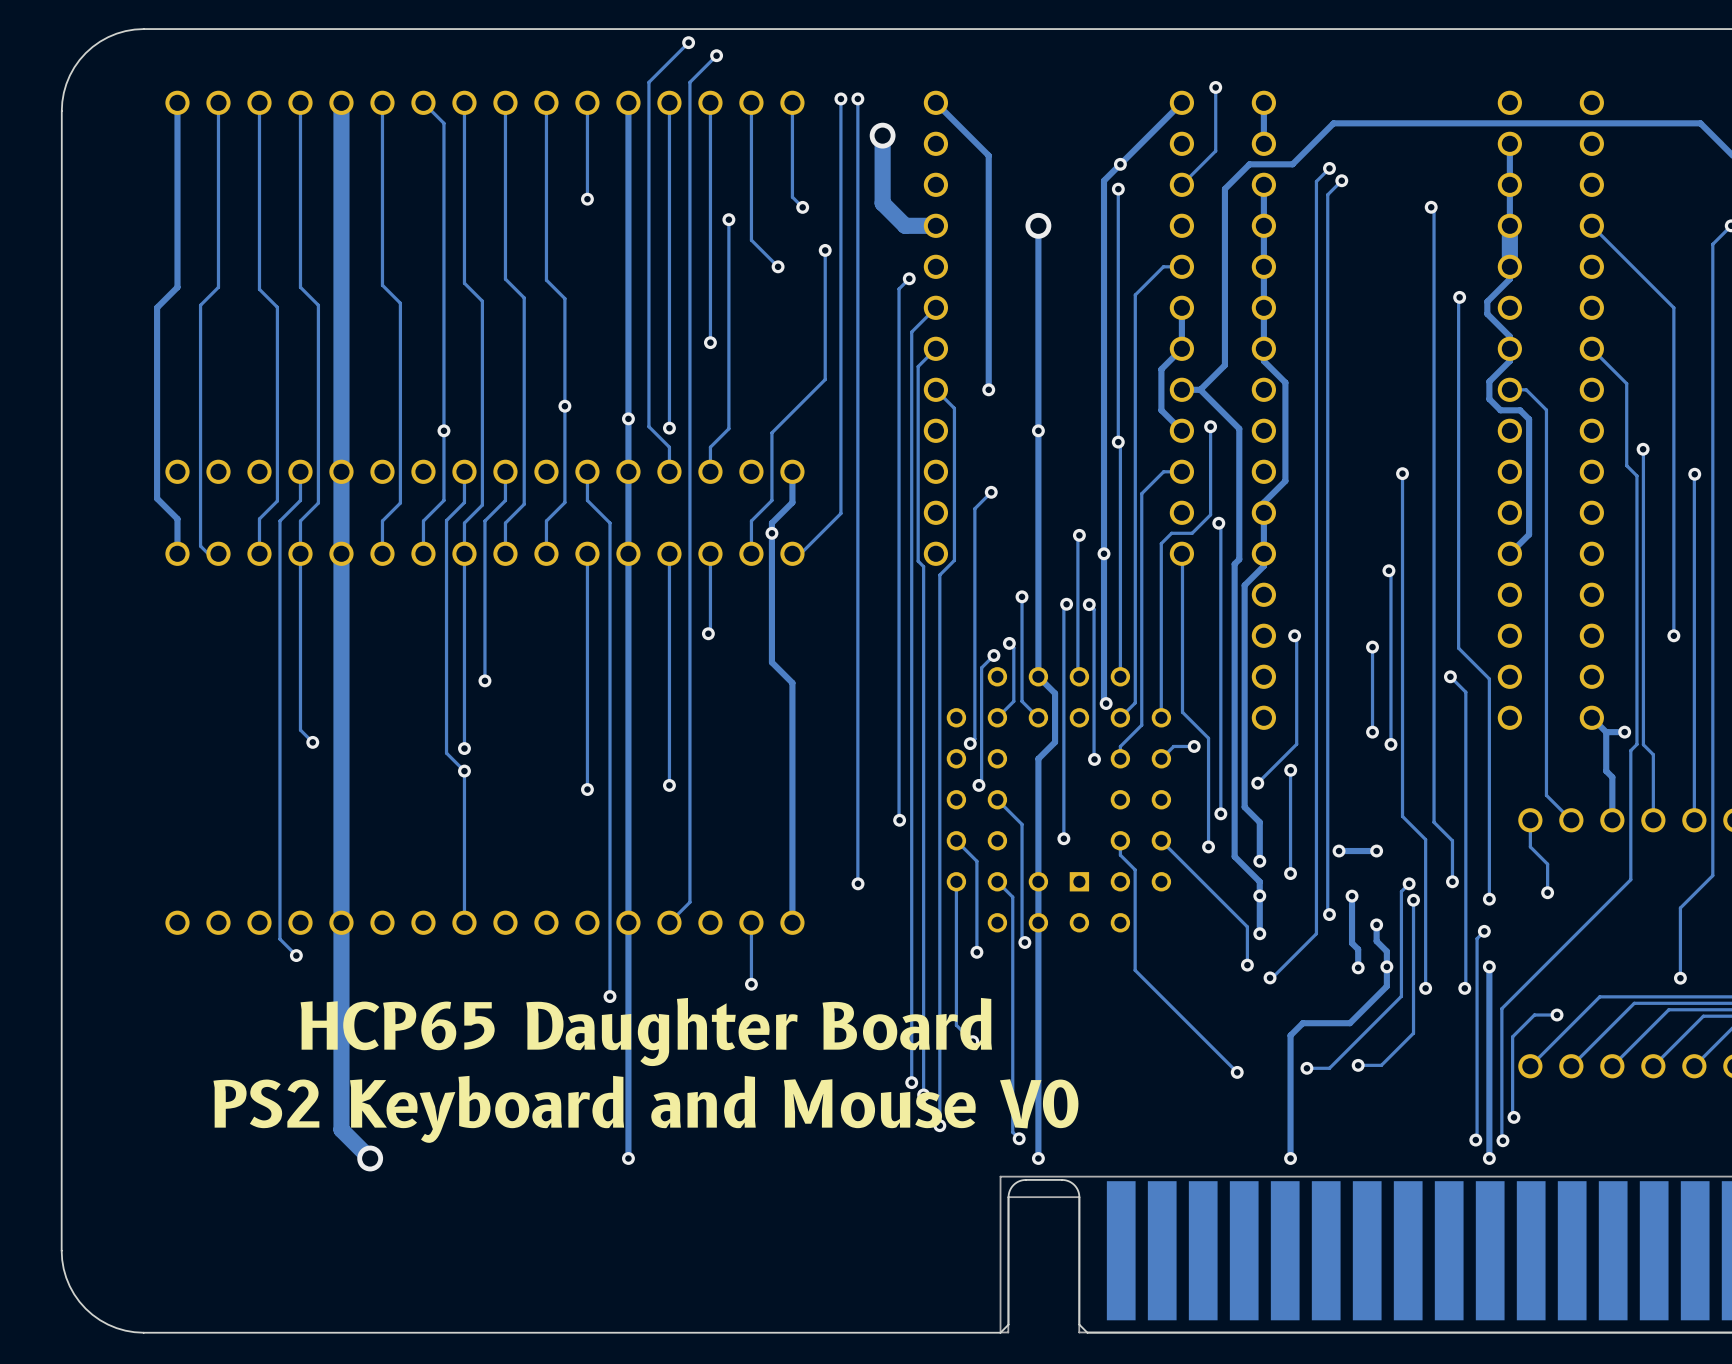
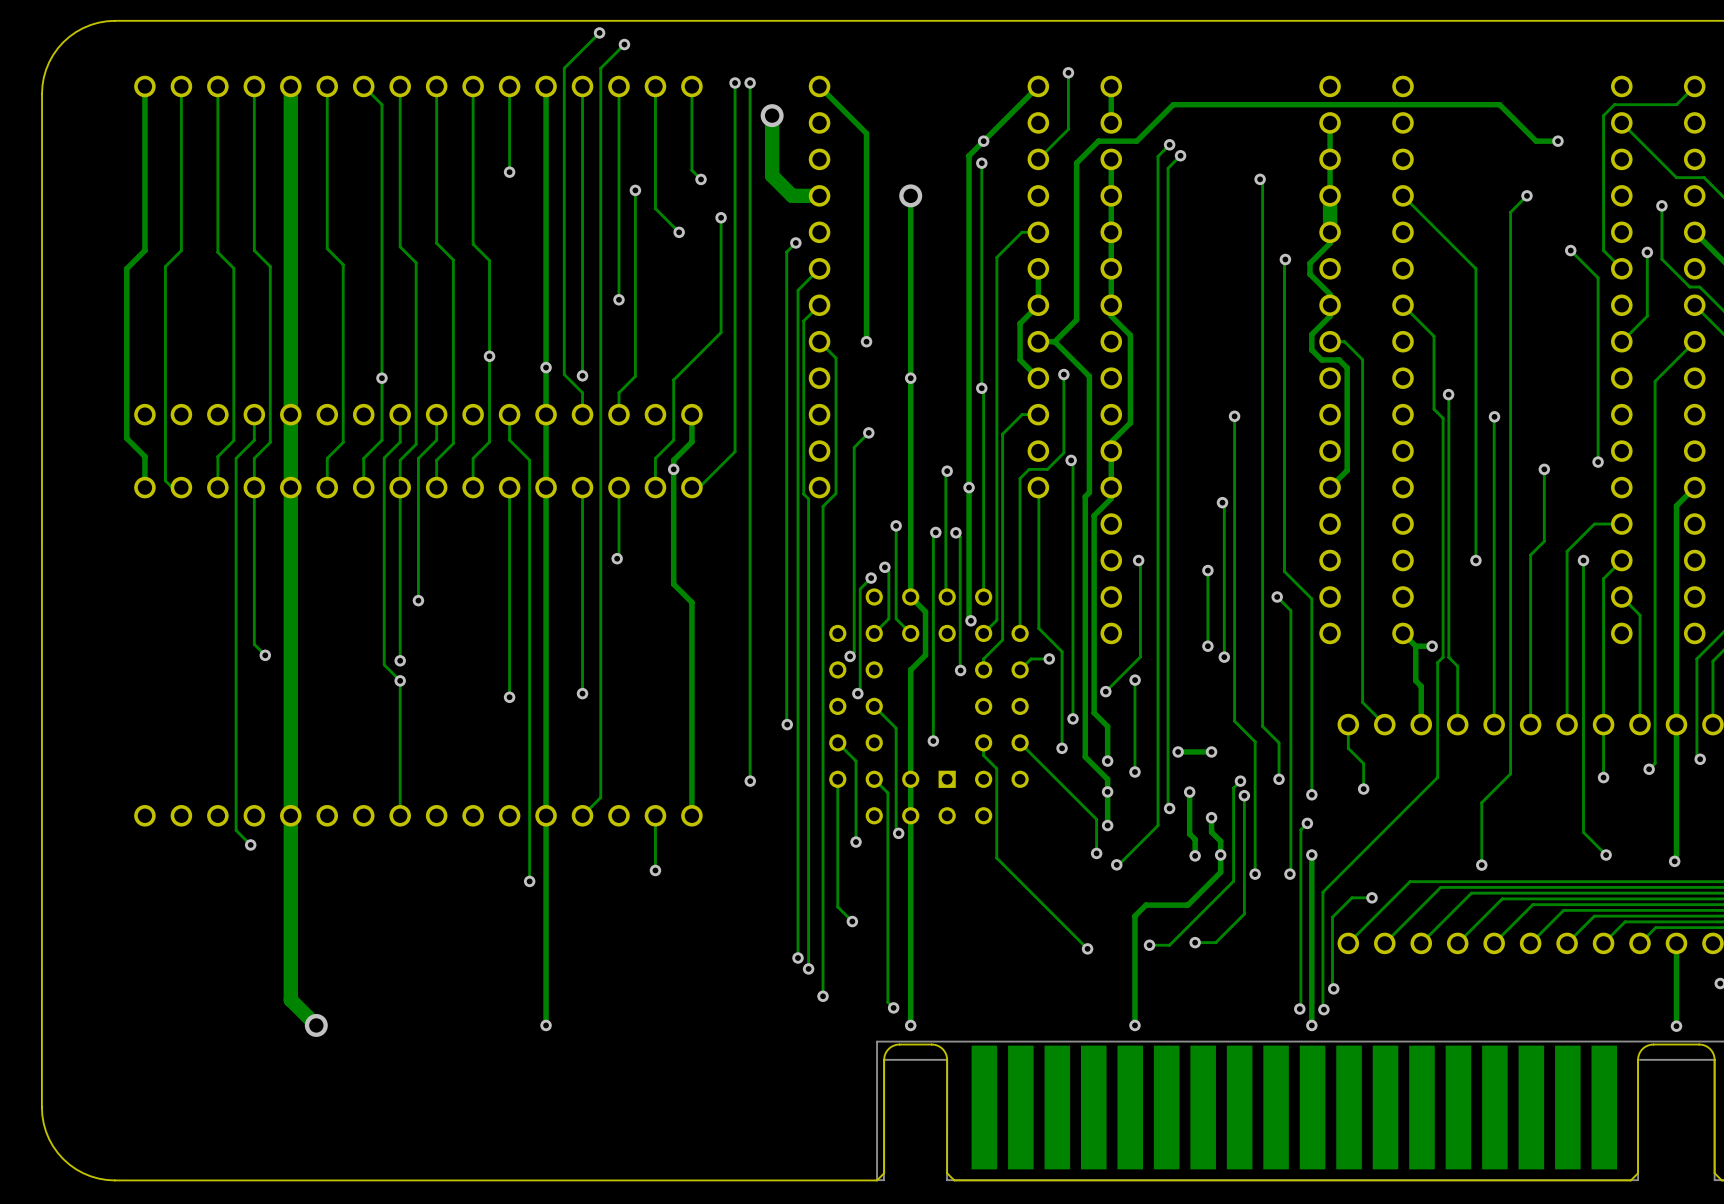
text: HCP65 Daughter Board (646, 1031) -> none
text: PS2 Keyboard and Mouse V0 (645, 1109) -> none

